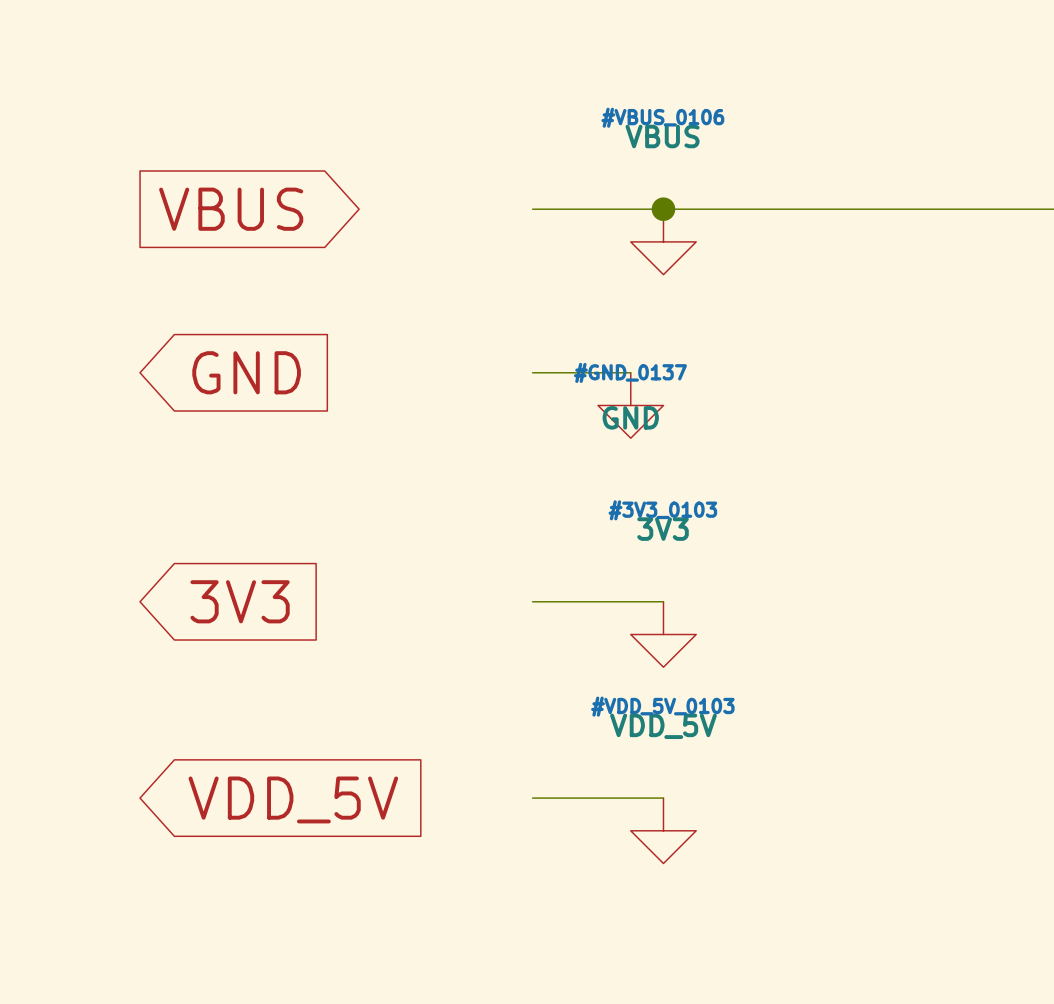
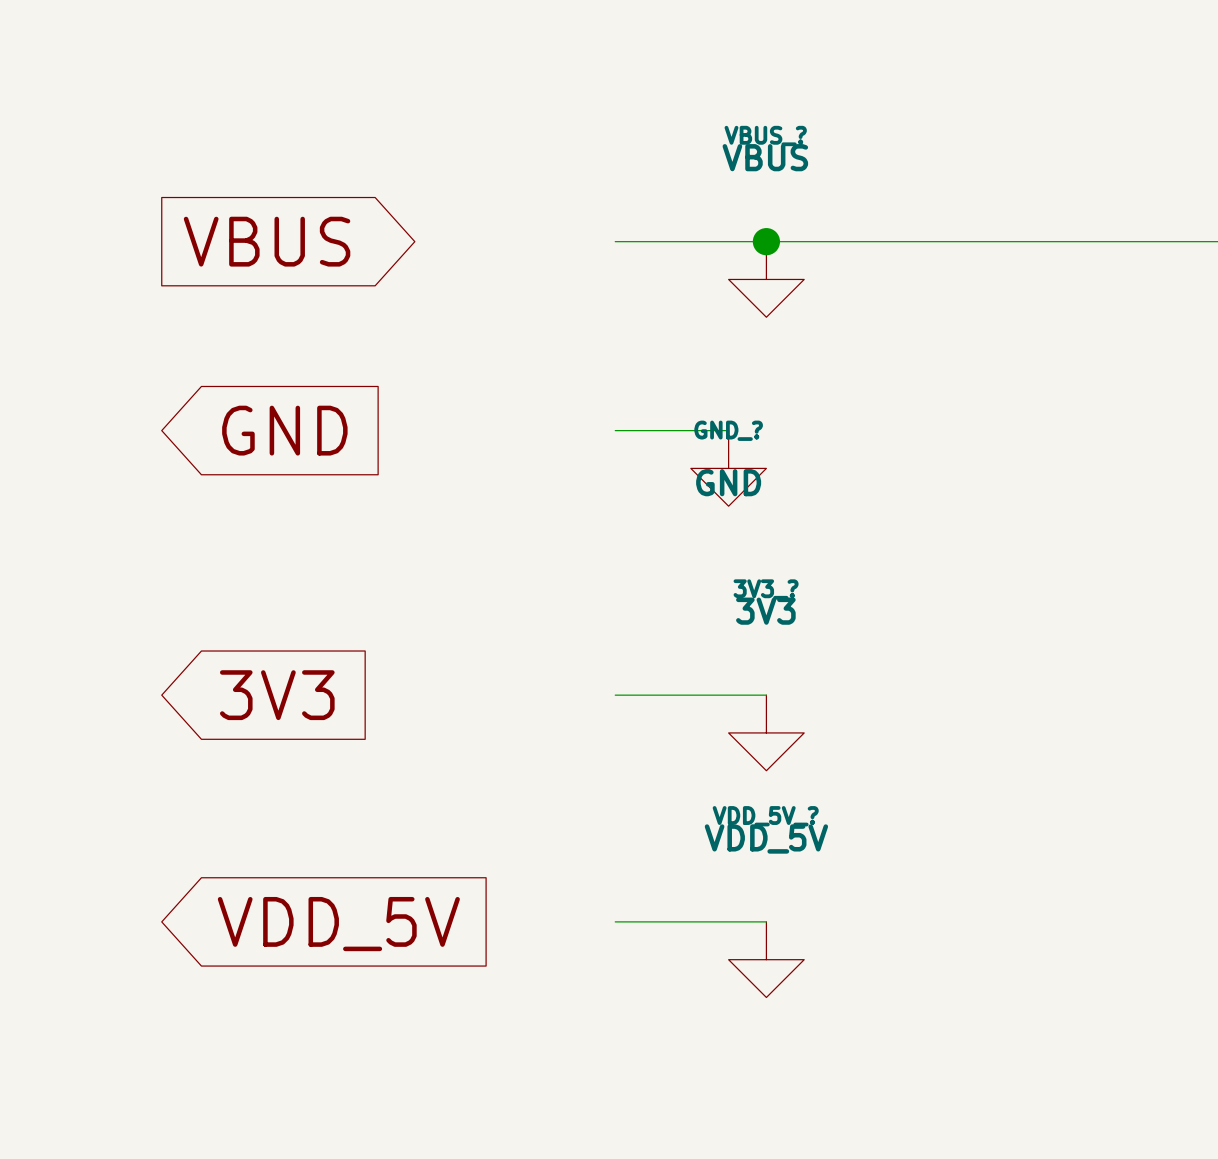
#VBUS_0106 name: #VBUS_0106 (662, 117) -> VBUS_? (765, 136)
#GND_0137 name: #GND_0137 (630, 372) -> GND_? (728, 430)
#3V3_0103 name: #3V3_0103 (662, 510) -> 3V3_? (766, 589)
#VDD_5V_0103 name: #VDD_5V_0103 (662, 706) -> VDD_5V_? (765, 816)

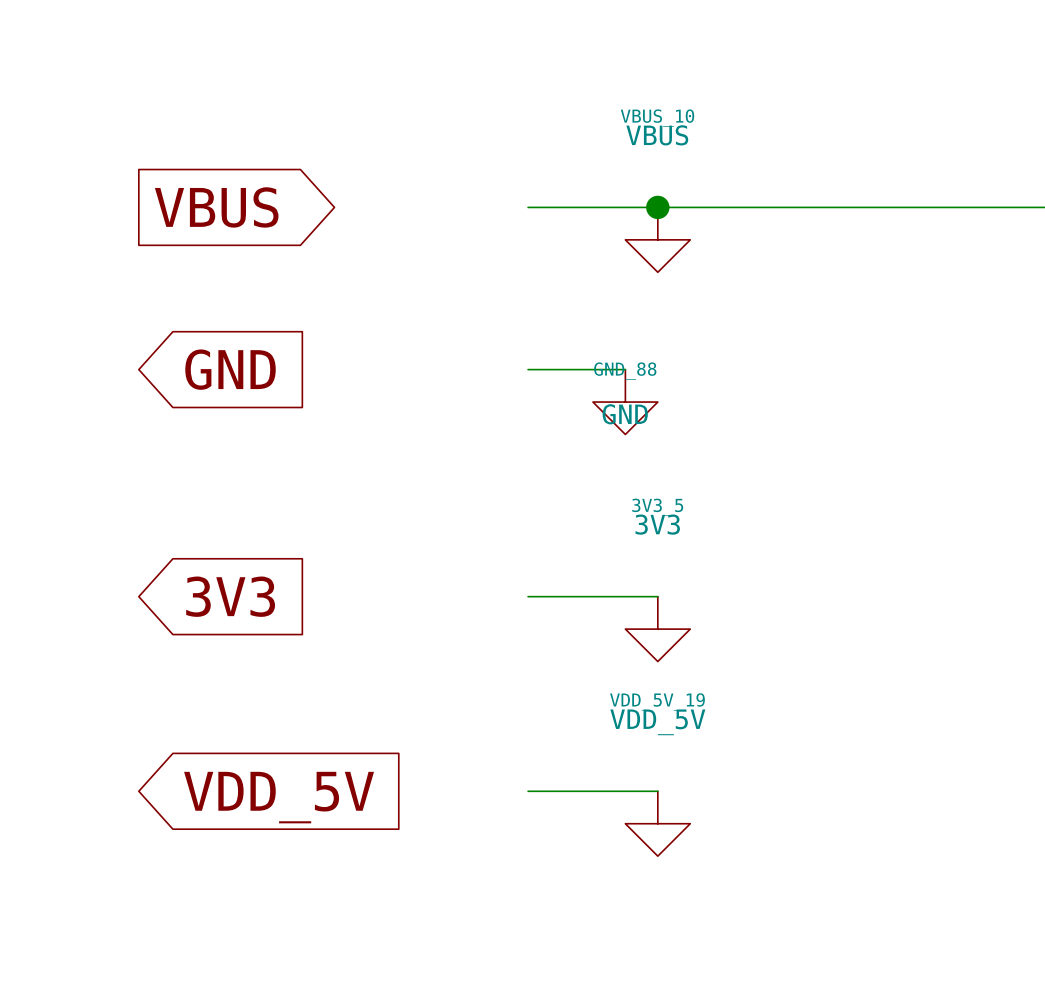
VBUS_? name: VBUS_? (765, 136) -> VBUS_10 (657, 118)
GND_? name: GND_? (728, 430) -> GND_88 (625, 371)
3V3_? name: 3V3_? (766, 589) -> 3V3_5 (657, 507)
VDD_5V_? name: VDD_5V_? (765, 816) -> VDD_5V_19 (657, 701)

